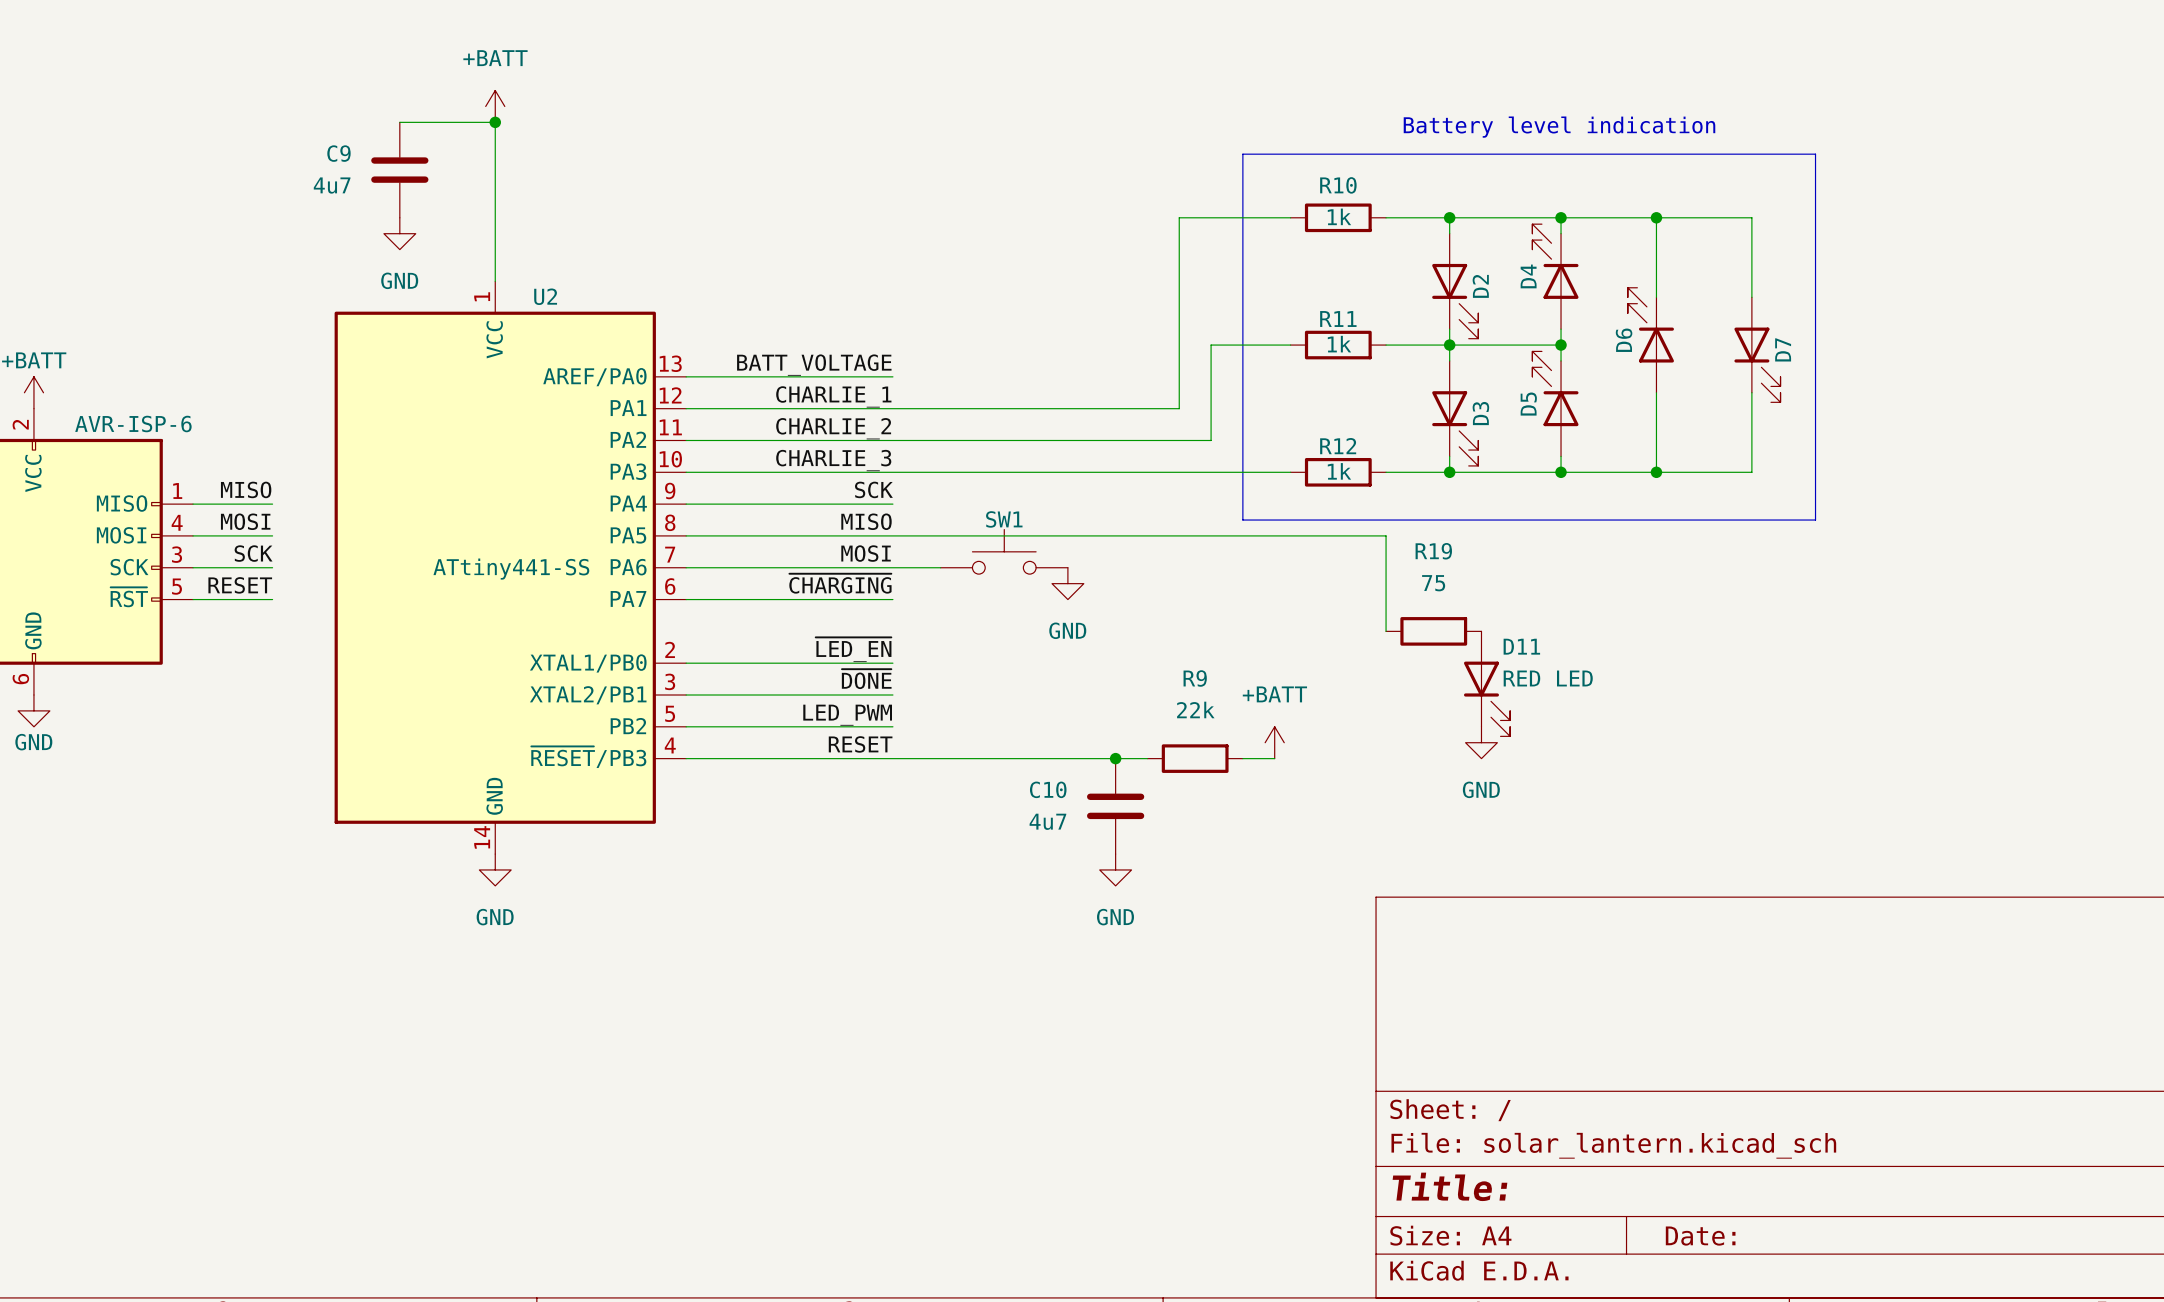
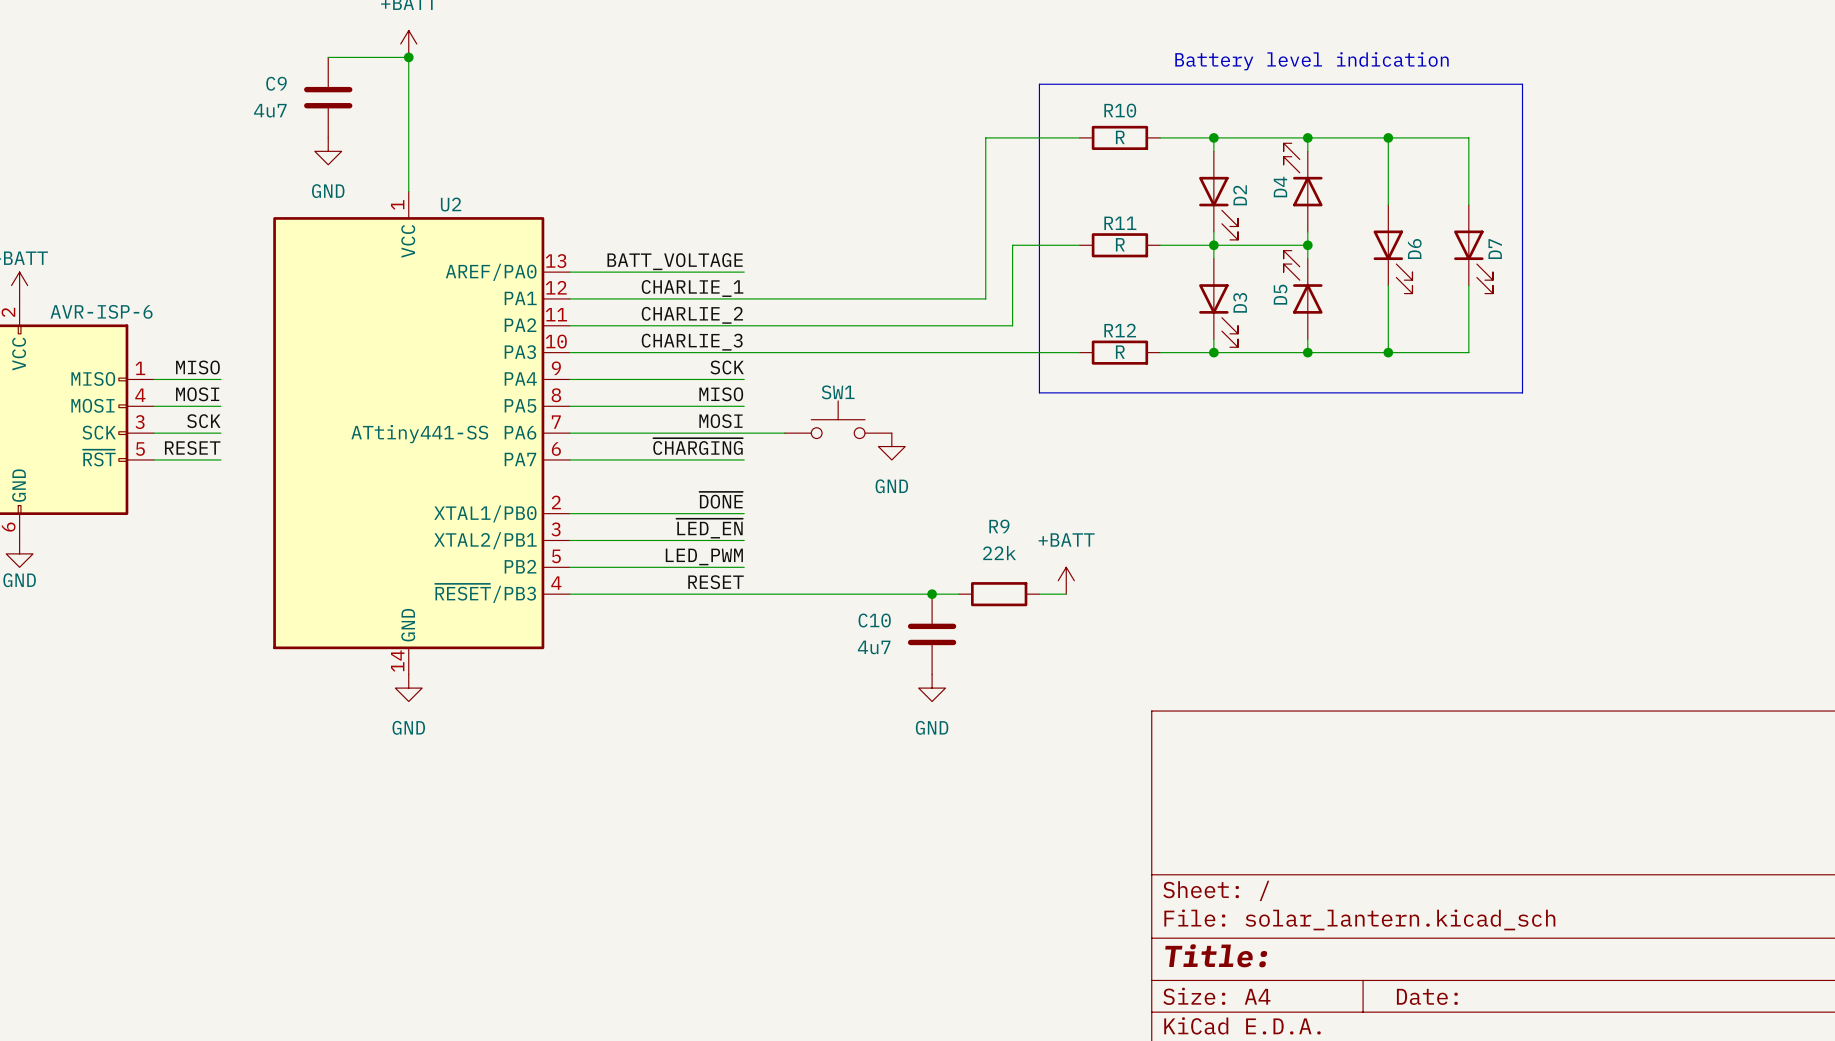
R10 value: 1k (1339, 216) -> R (1120, 137)
D6 rotation: 0° (1650, 325) -> 180° (1393, 262)
R11 value: 1k (1339, 344) -> R (1120, 244)
R12 value: 1k (1339, 471) -> R (1120, 352)
wire: (892, 535) (1386, 535) (1386, 631) -> none
R19: 75 (1433, 631) -> none
label: ~{LED_EN} (853, 649) -> ~{DONE} (721, 500)
label: ~{DONE} (866, 679) -> ~{LED_EN} (709, 528)
D11: RED LED (1487, 683) -> none
power symbol: GND (1481, 742) -> none

